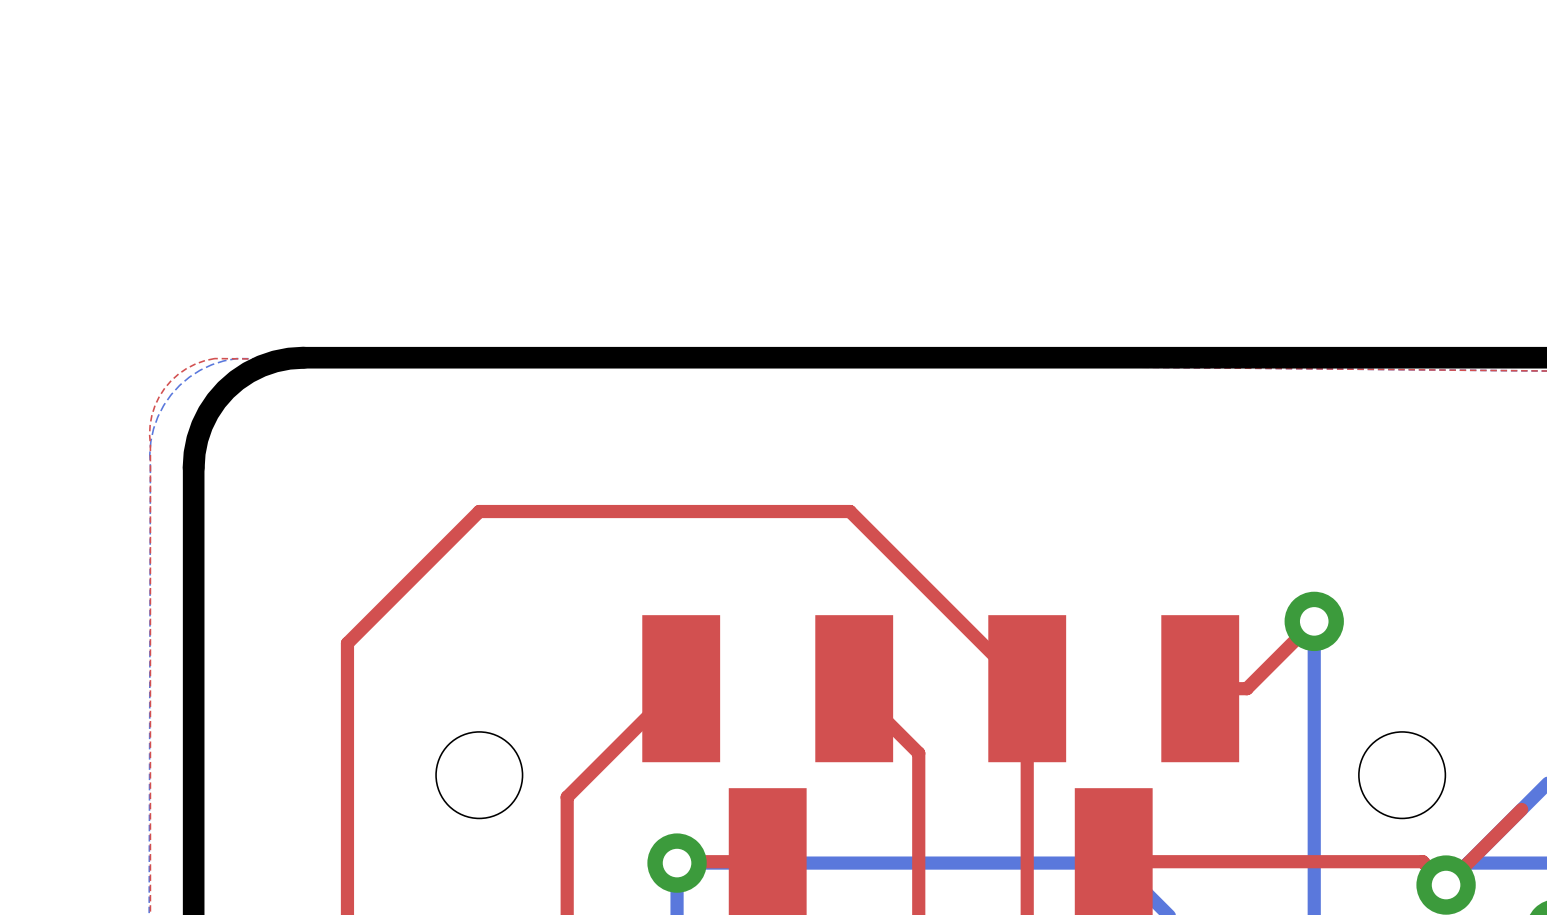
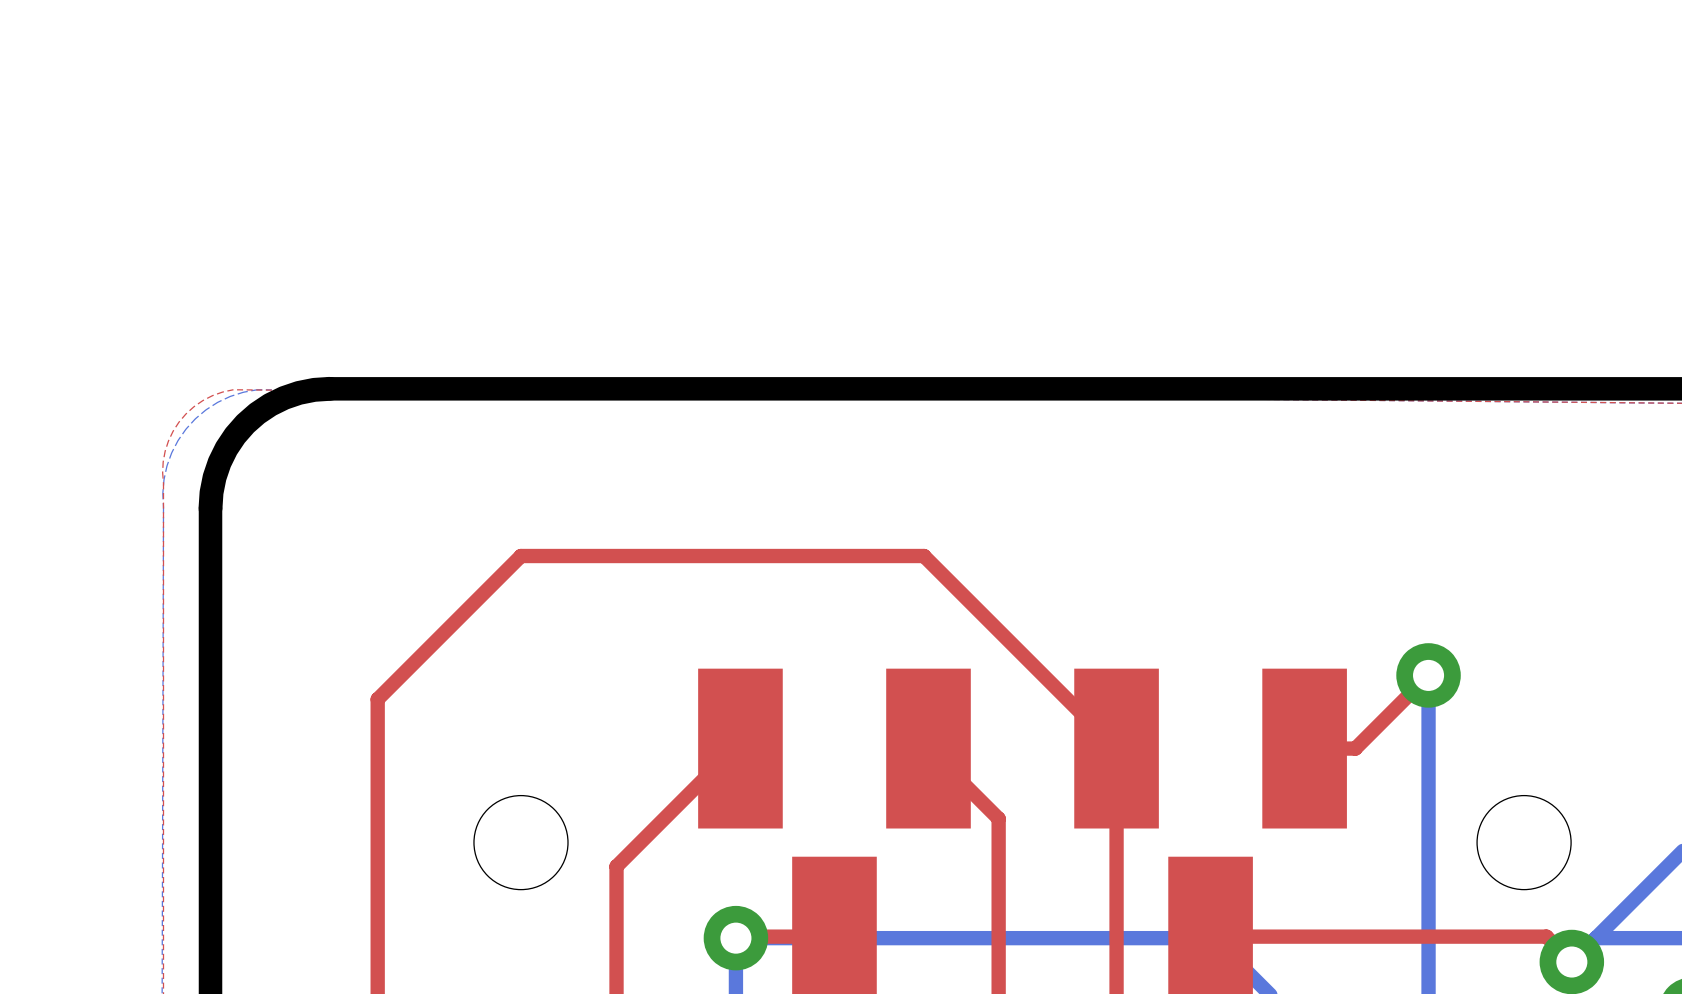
top track: (1521, 809) (1446, 885) -> none

